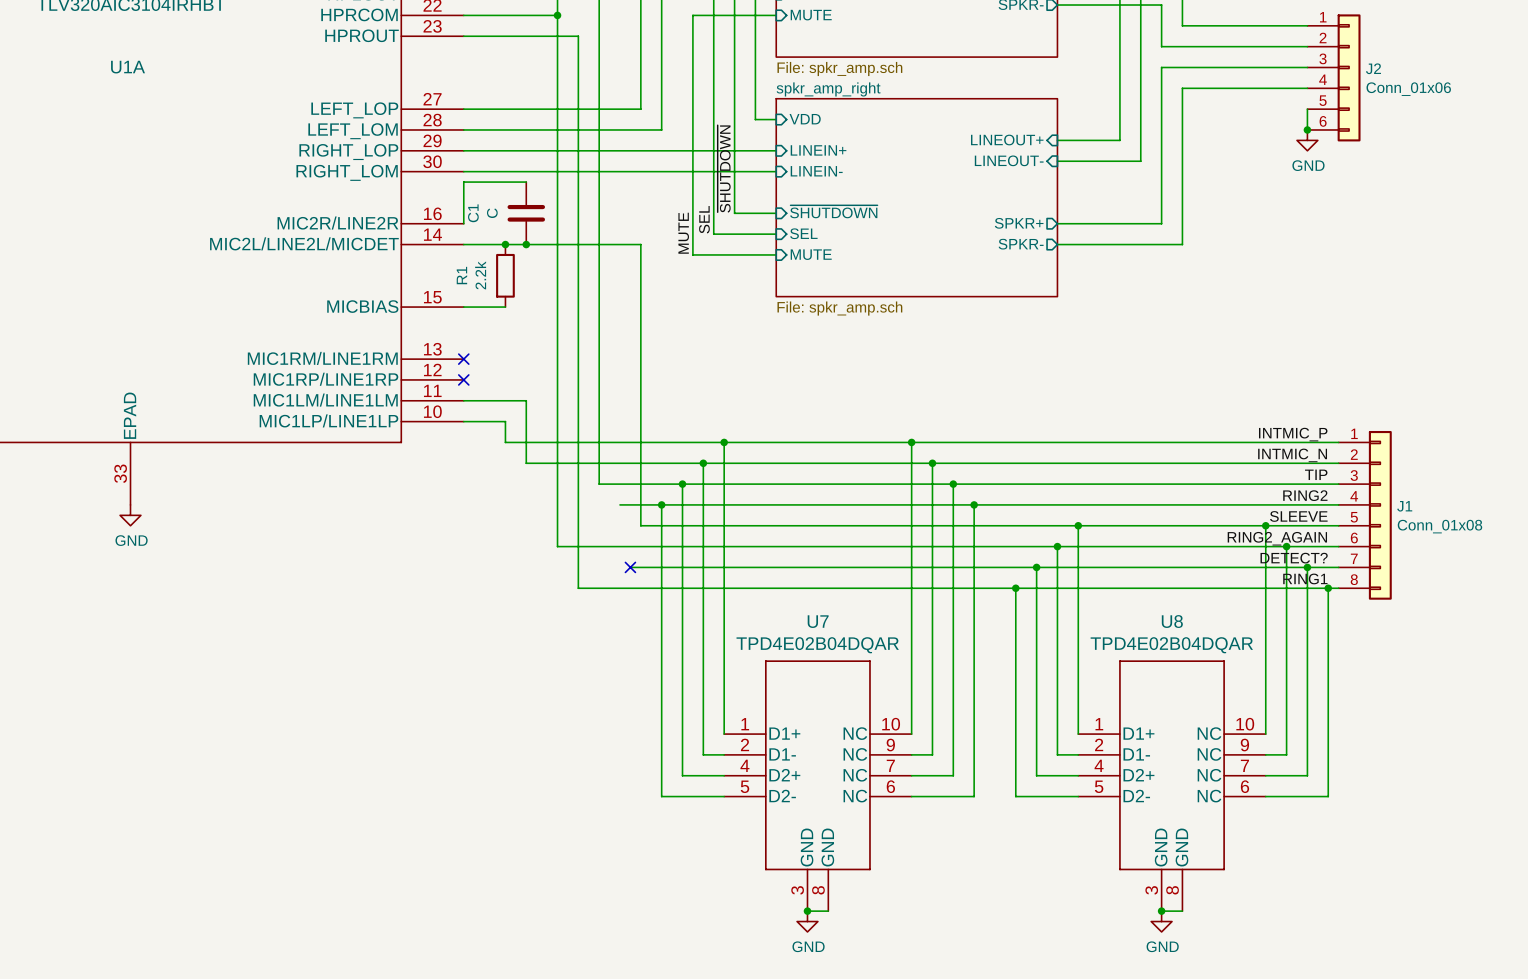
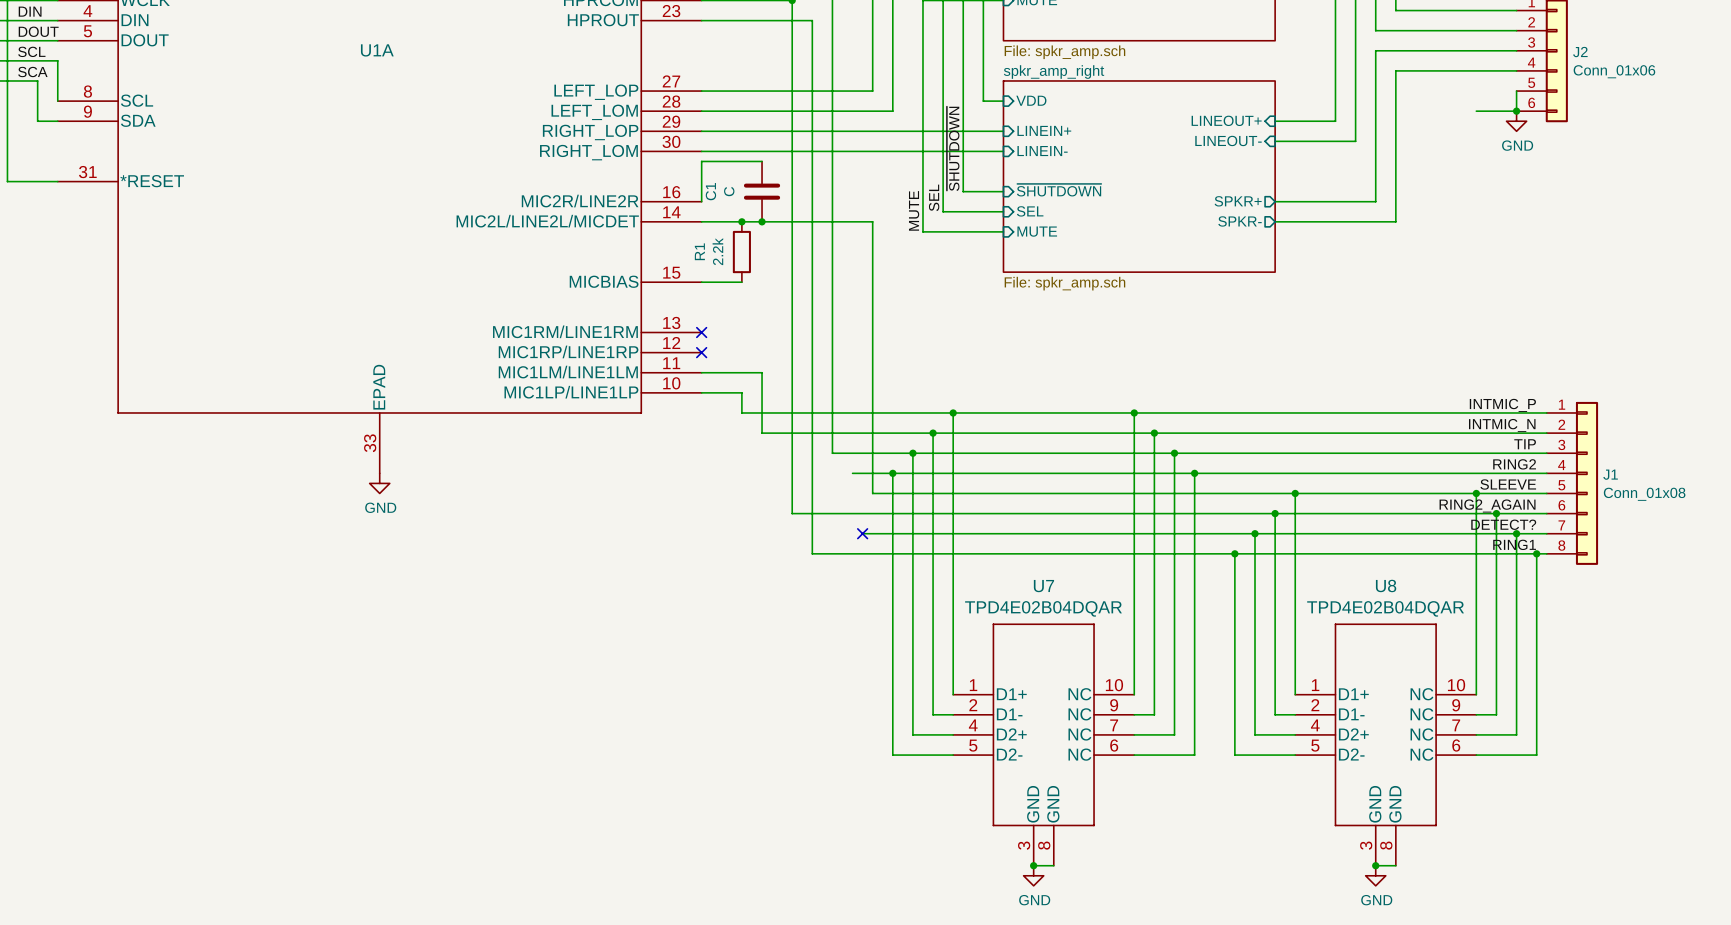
wire: none -> (1476, 111) (1516, 111)

